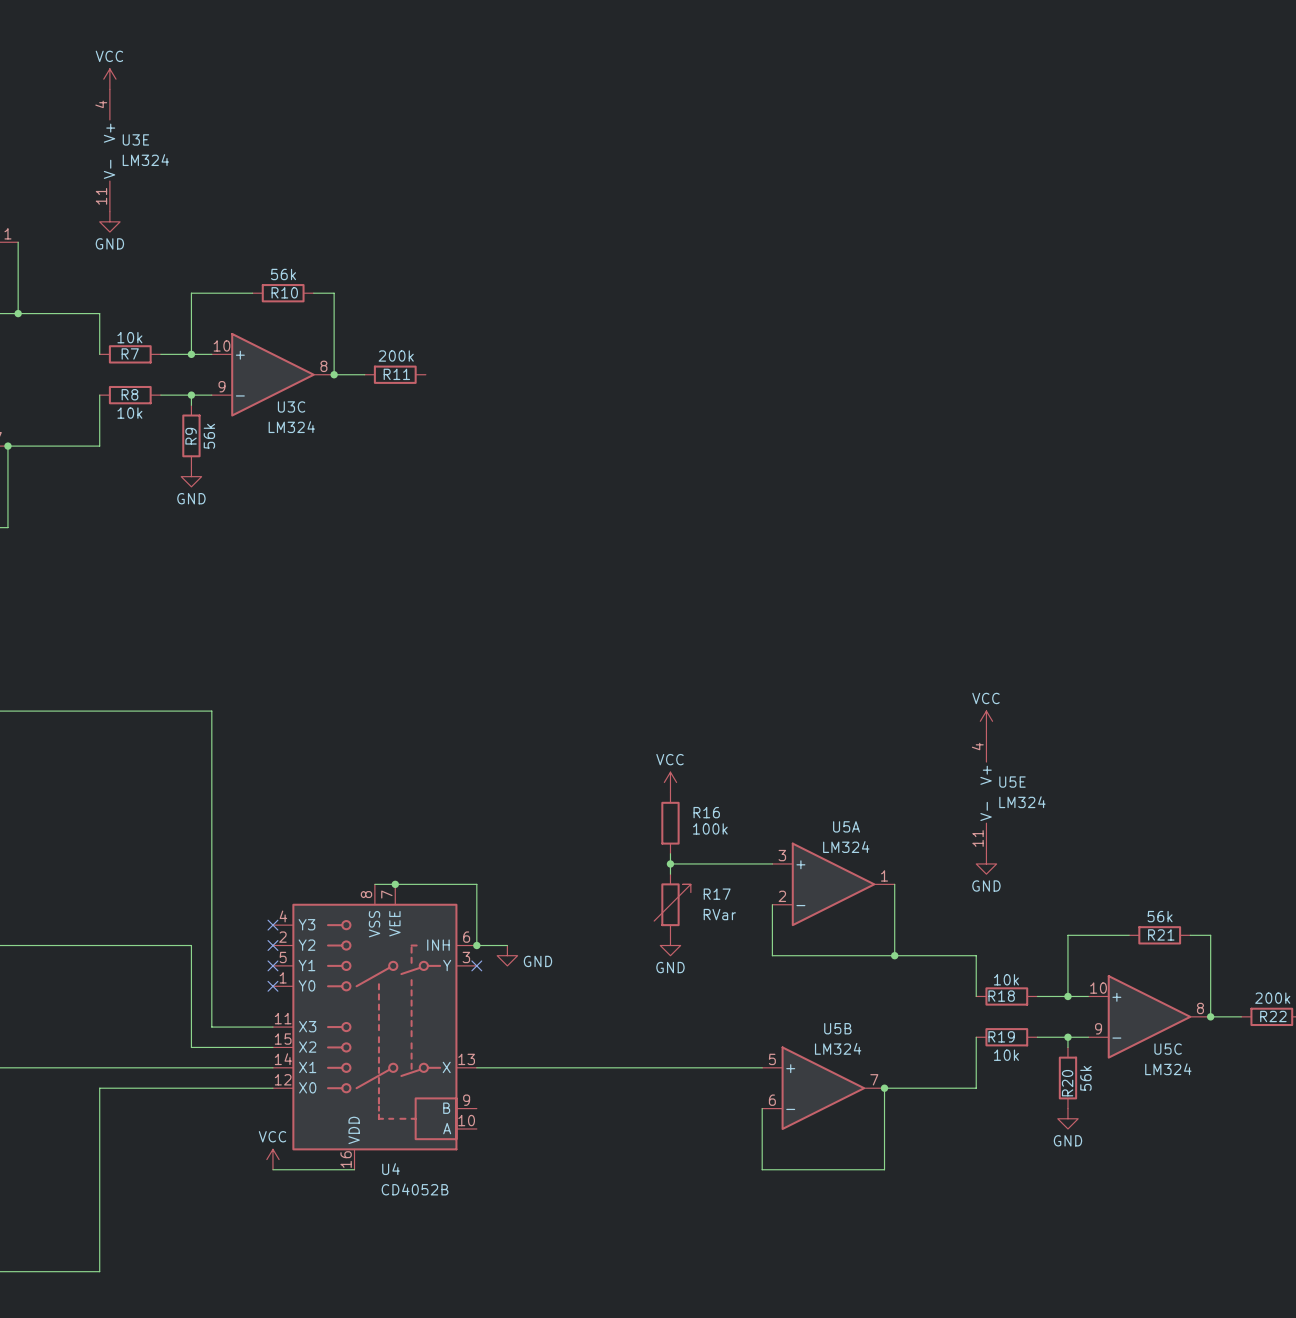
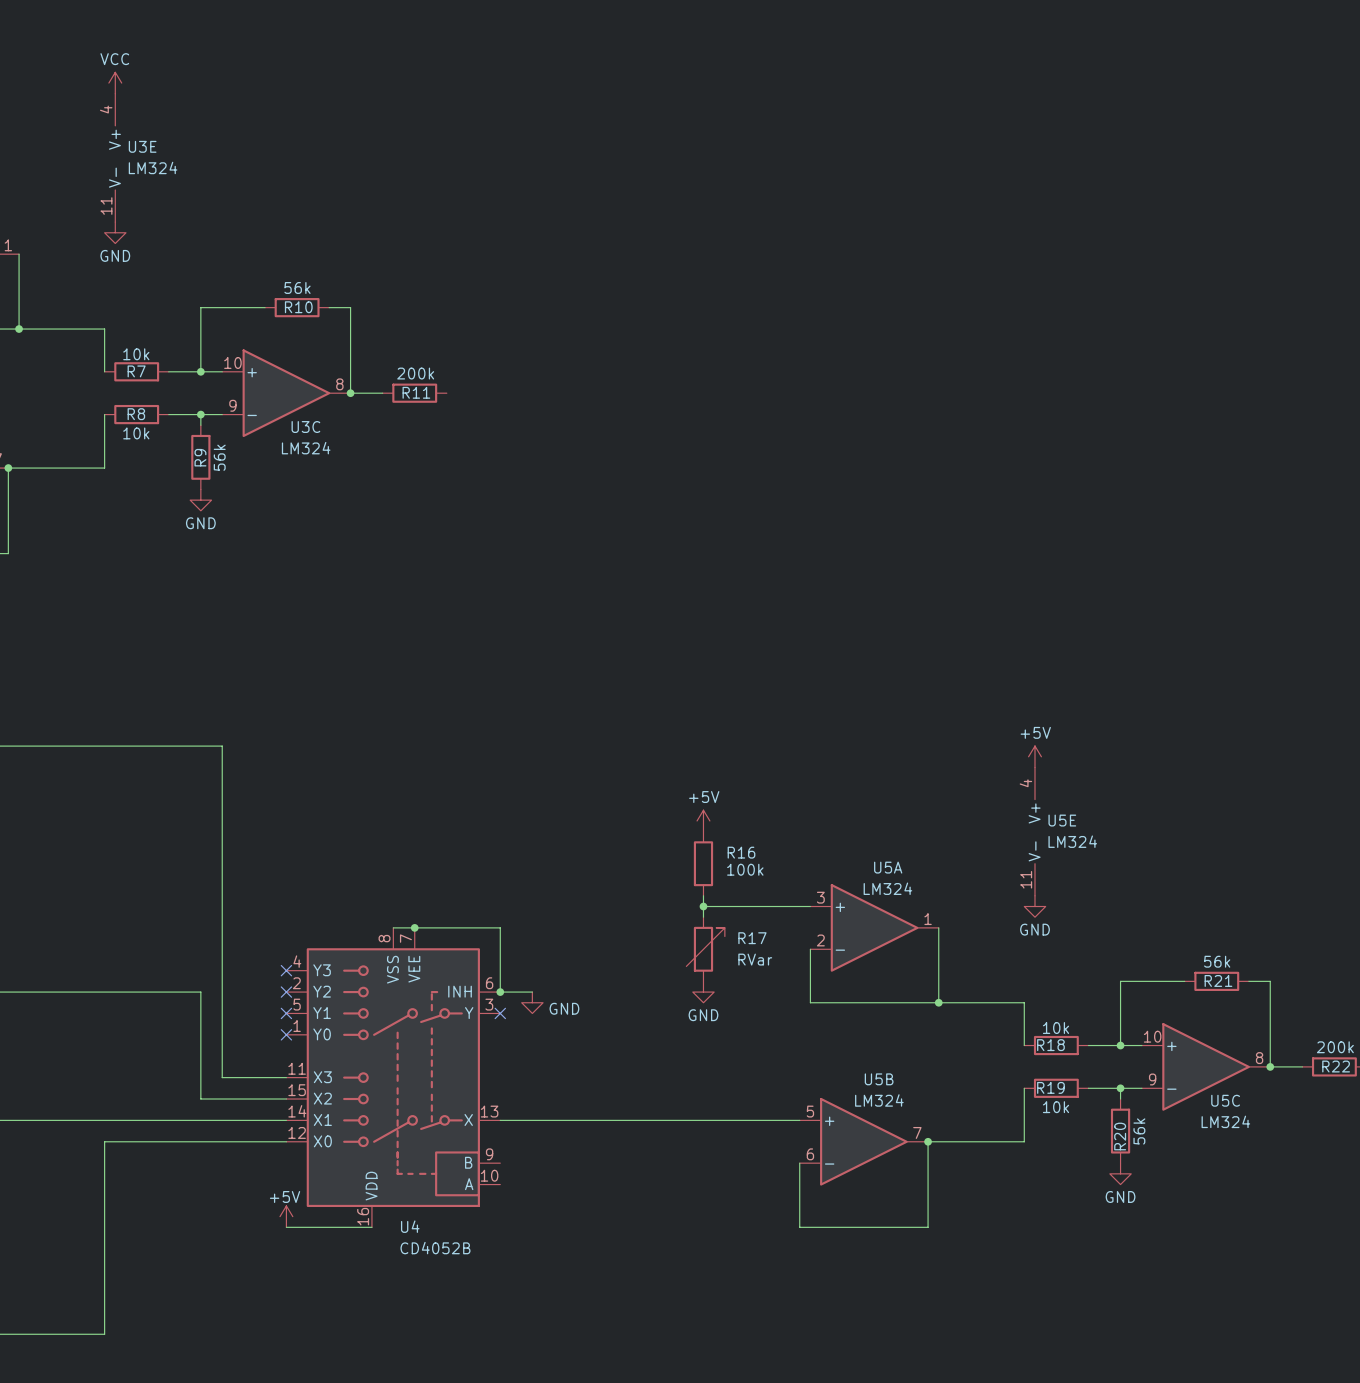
power symbol: VCC (986, 721) -> +5V (1034, 756)
power symbol: VCC (670, 782) -> +5V (703, 820)
power symbol: VCC (272, 1159) -> +5V (286, 1216)

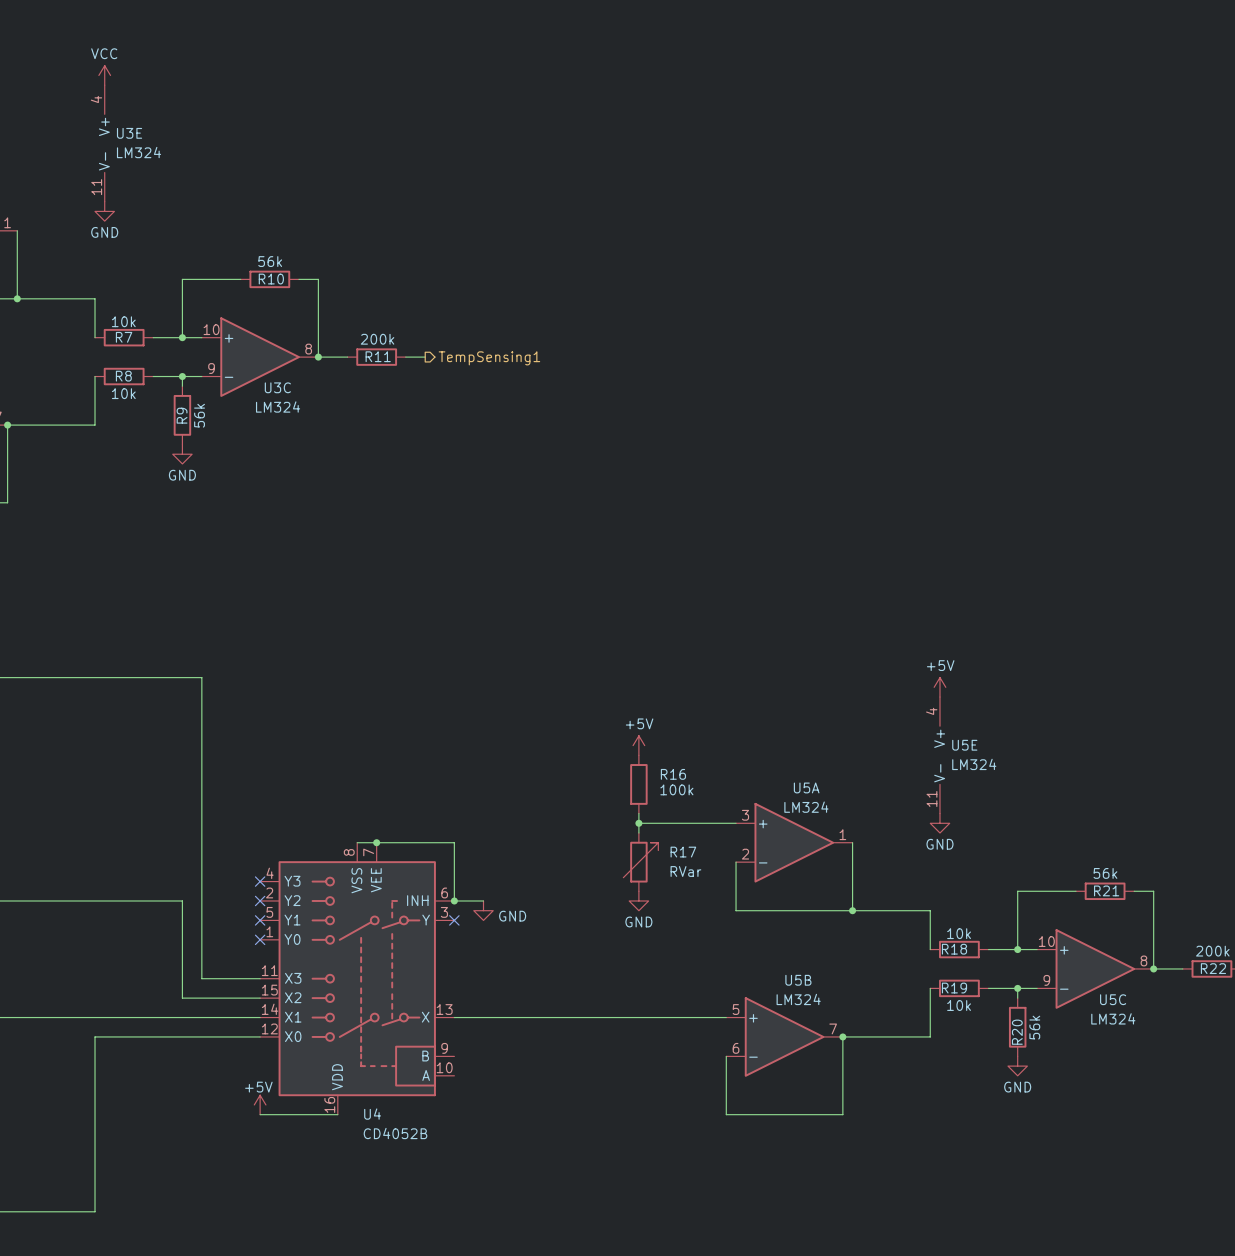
wire: none -> (405, 357) (425, 357)
hierarchical label: none -> TempSensing1 (489, 358)

